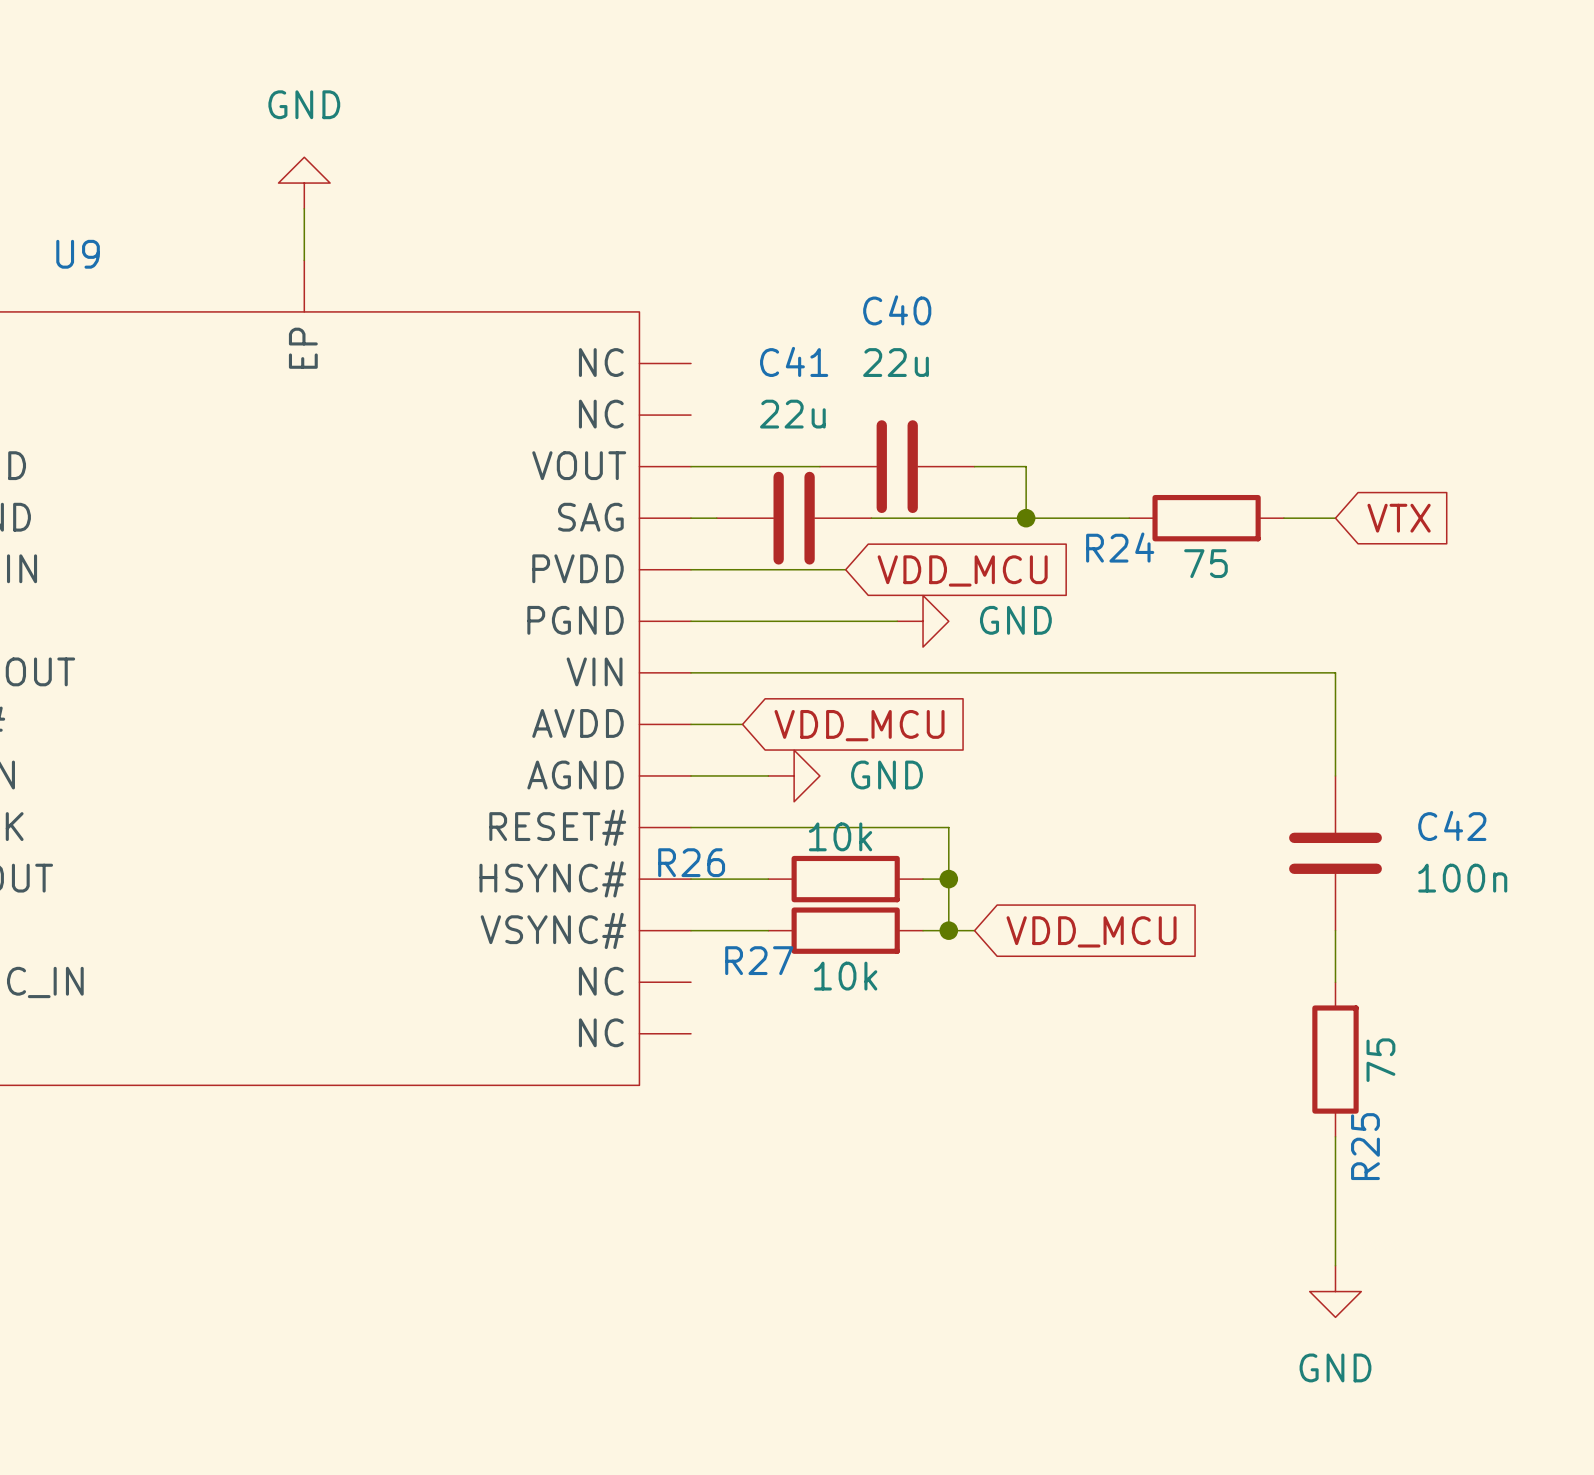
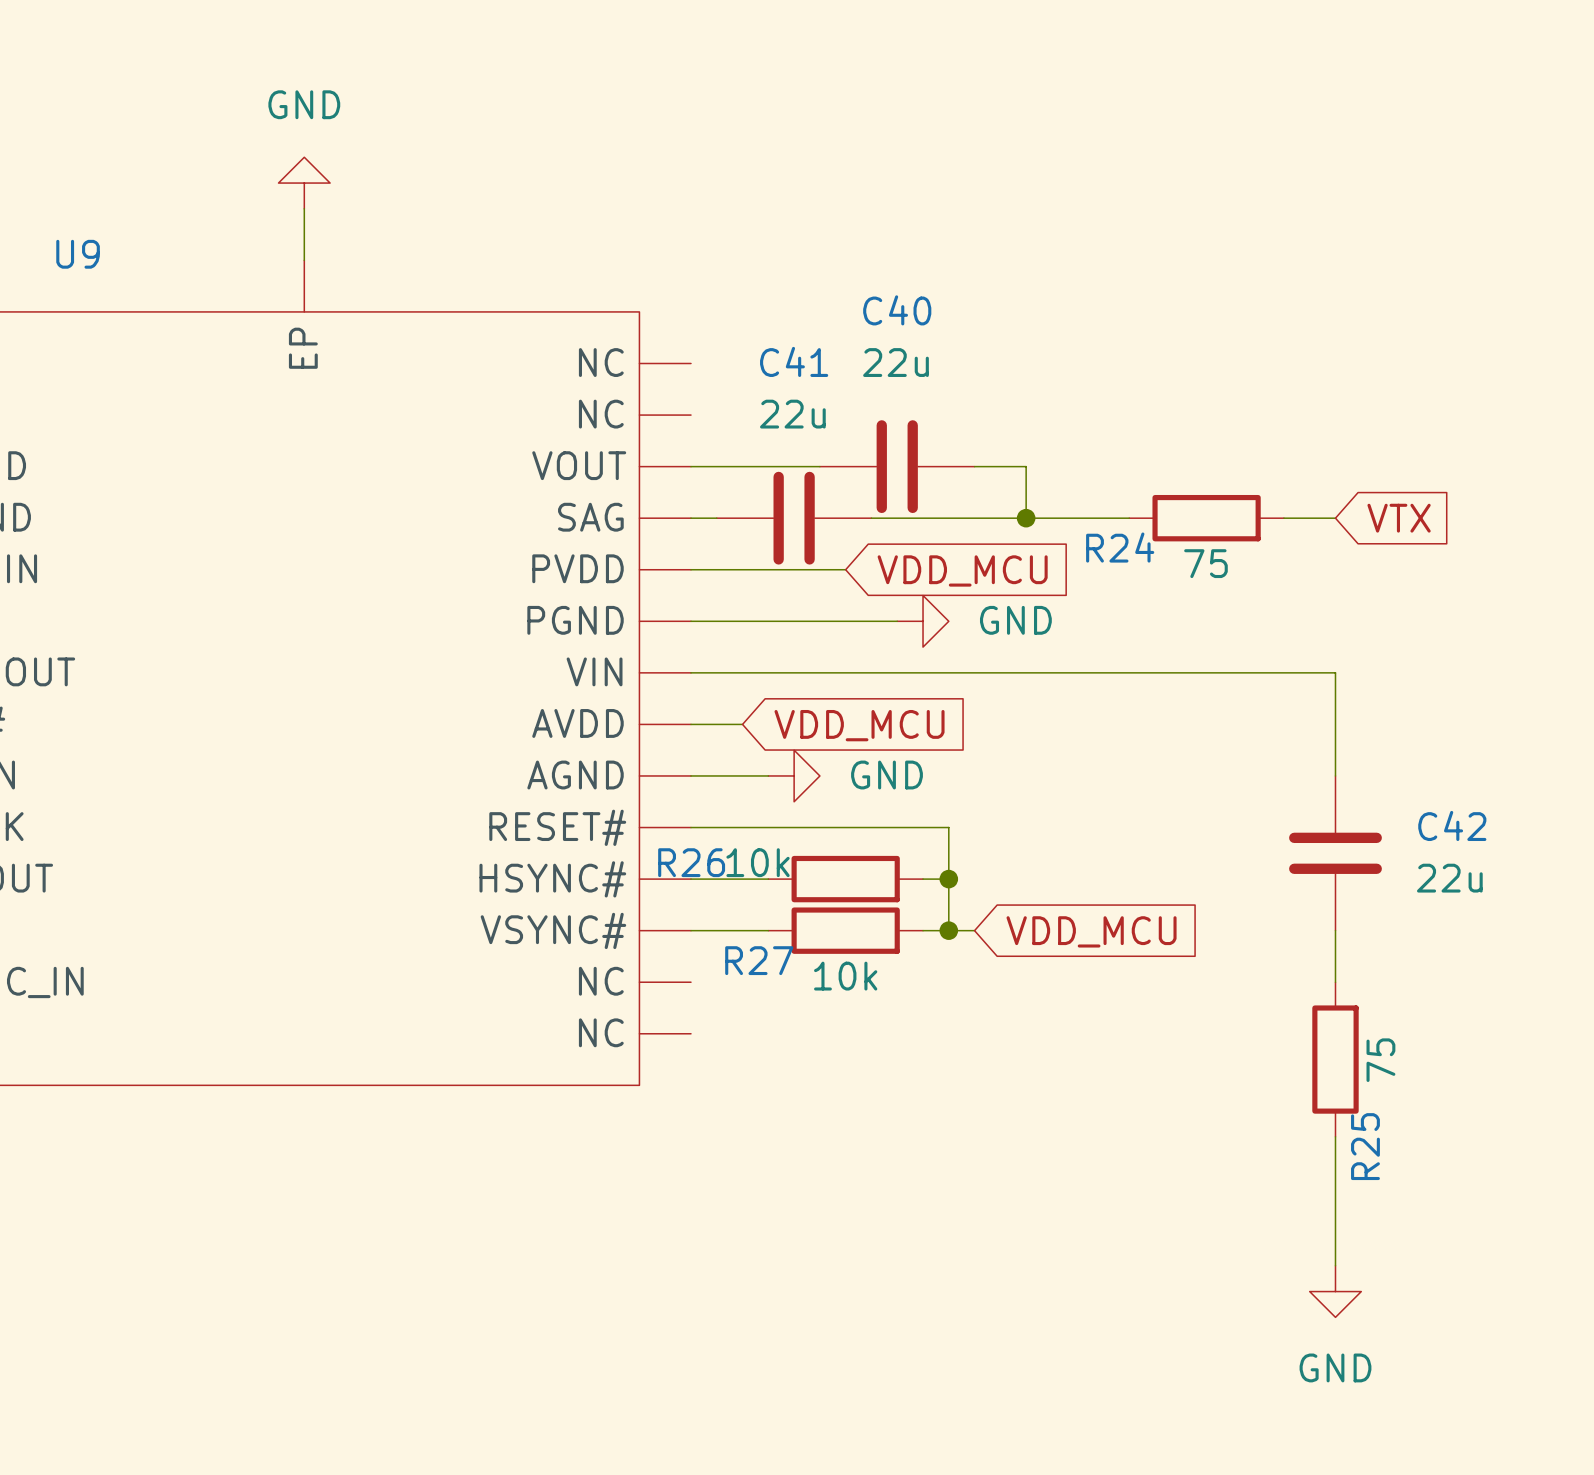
R26 value position: 10k (840, 836) -> 10k (758, 862)
C42 value: 100n (1462, 878) -> 22u (1449, 878)

